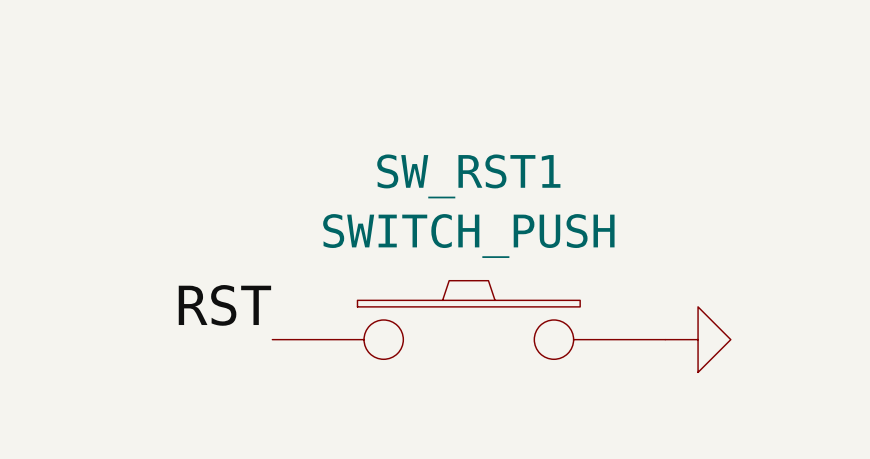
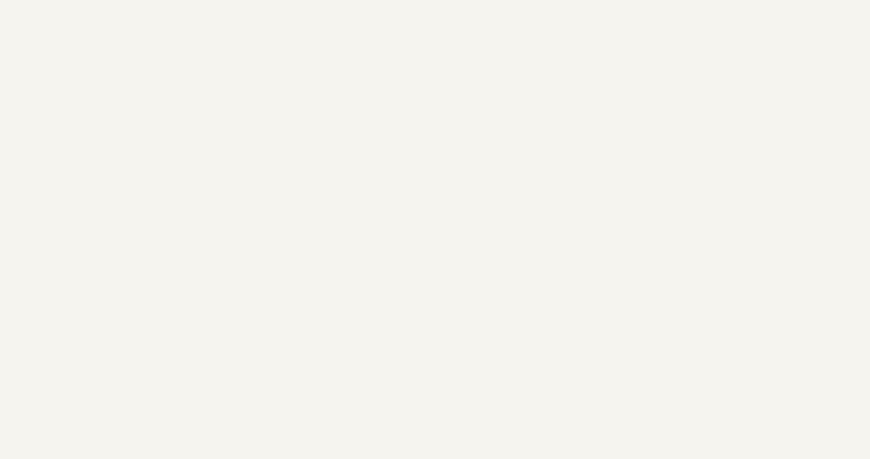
label: RST (224, 305) -> none
SW_RST1: SWITCH_PUSH (468, 319) -> none
power symbol: (698, 339) -> none

